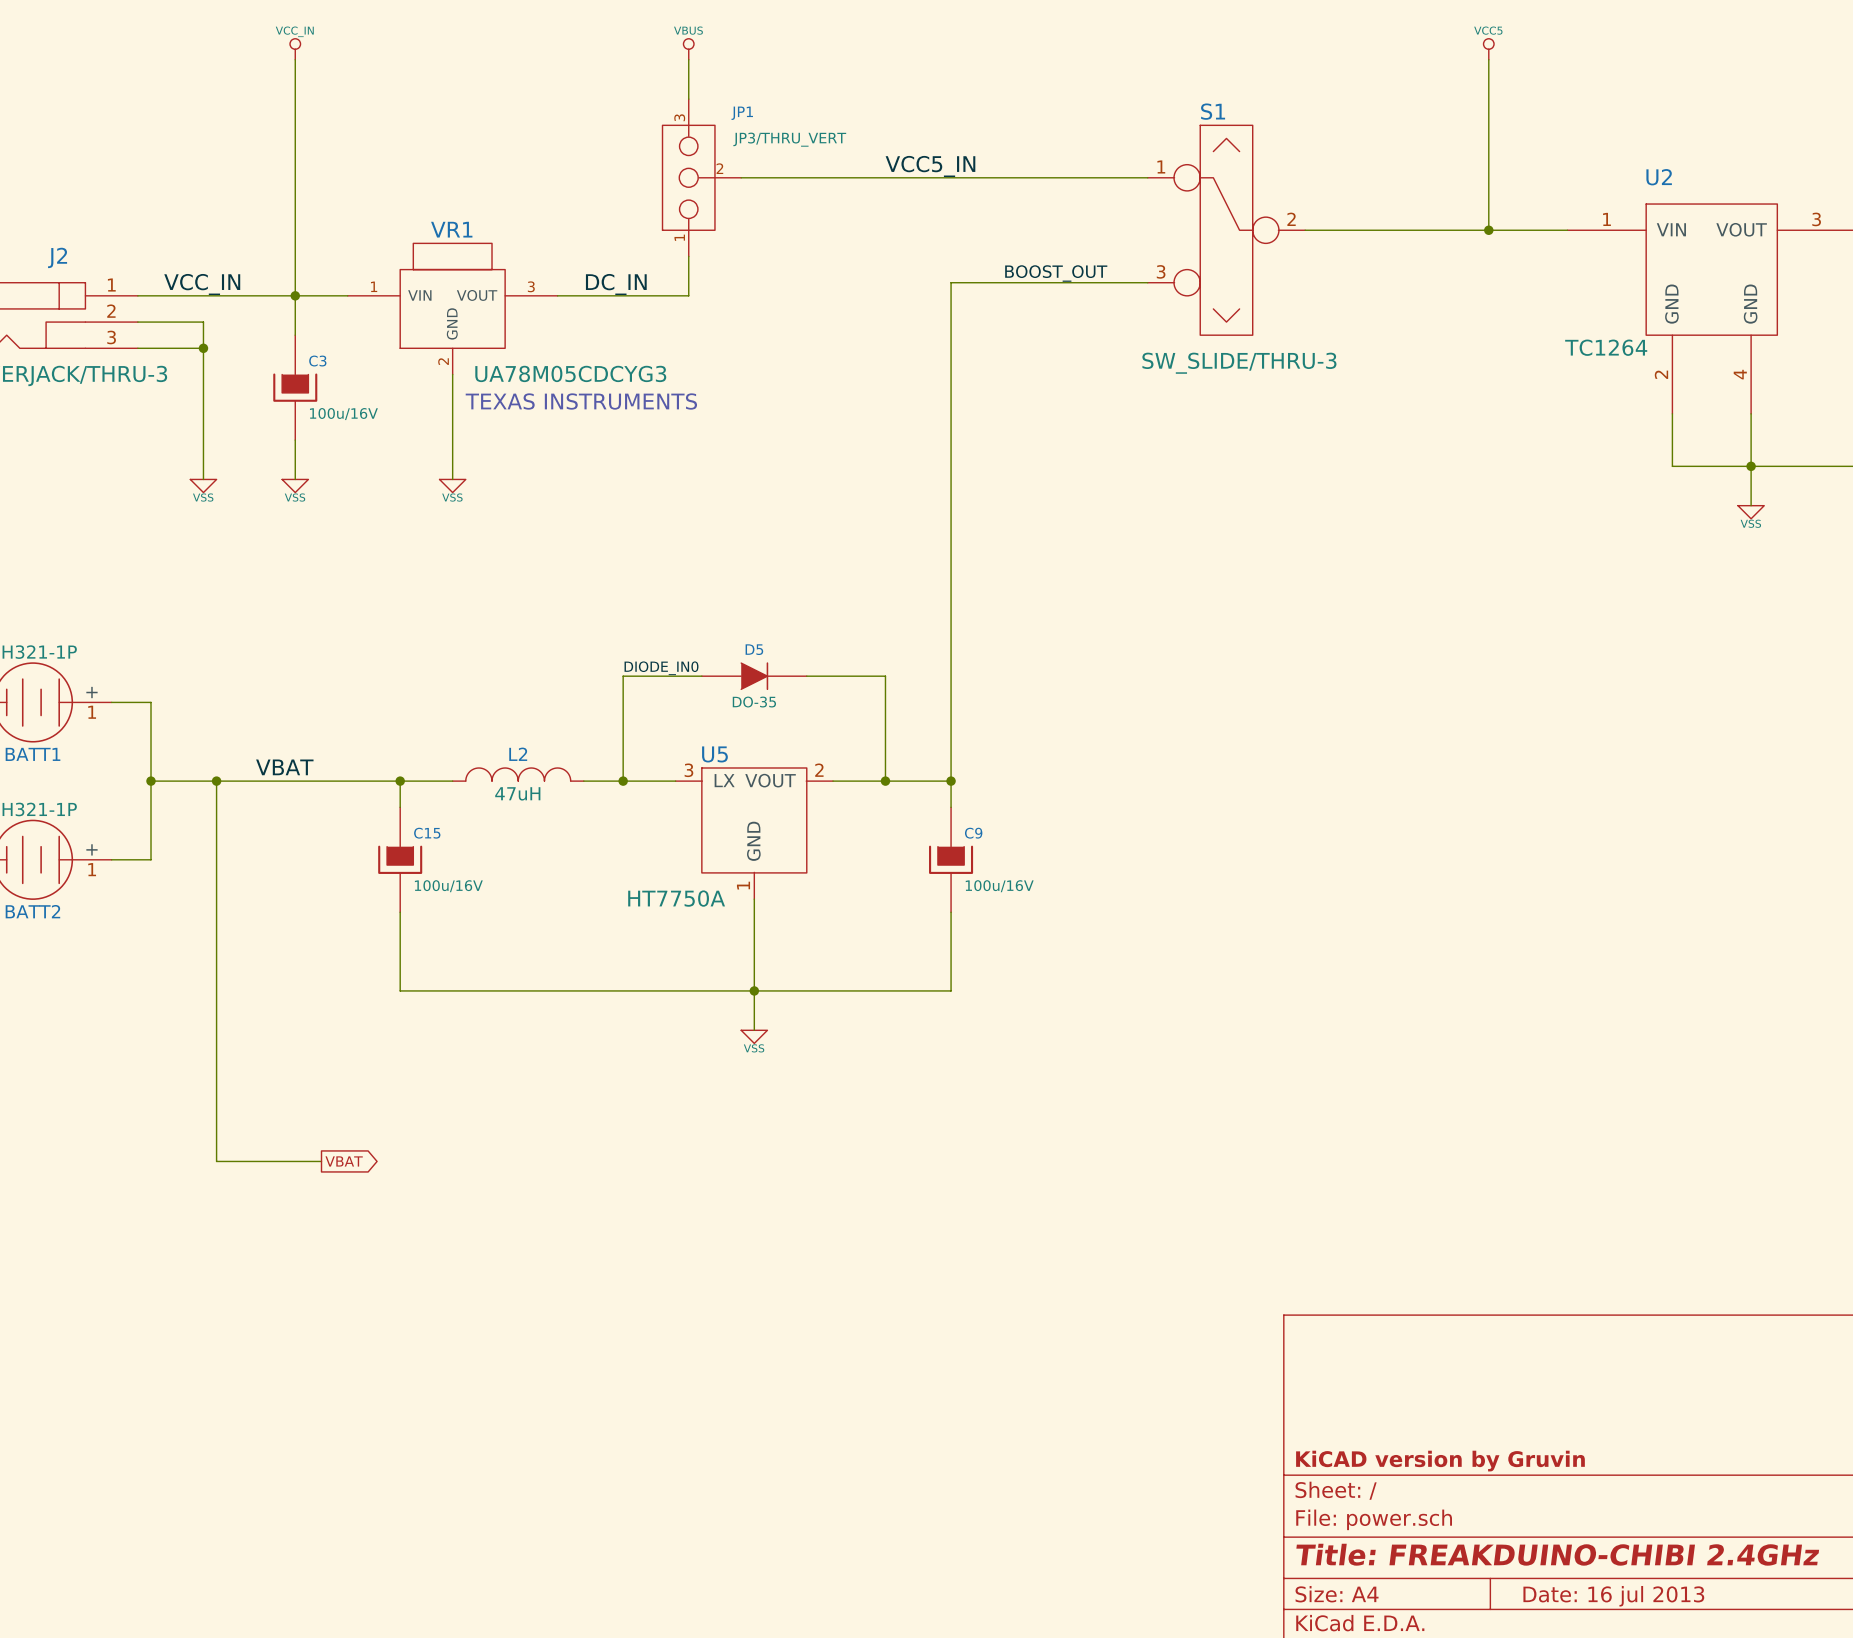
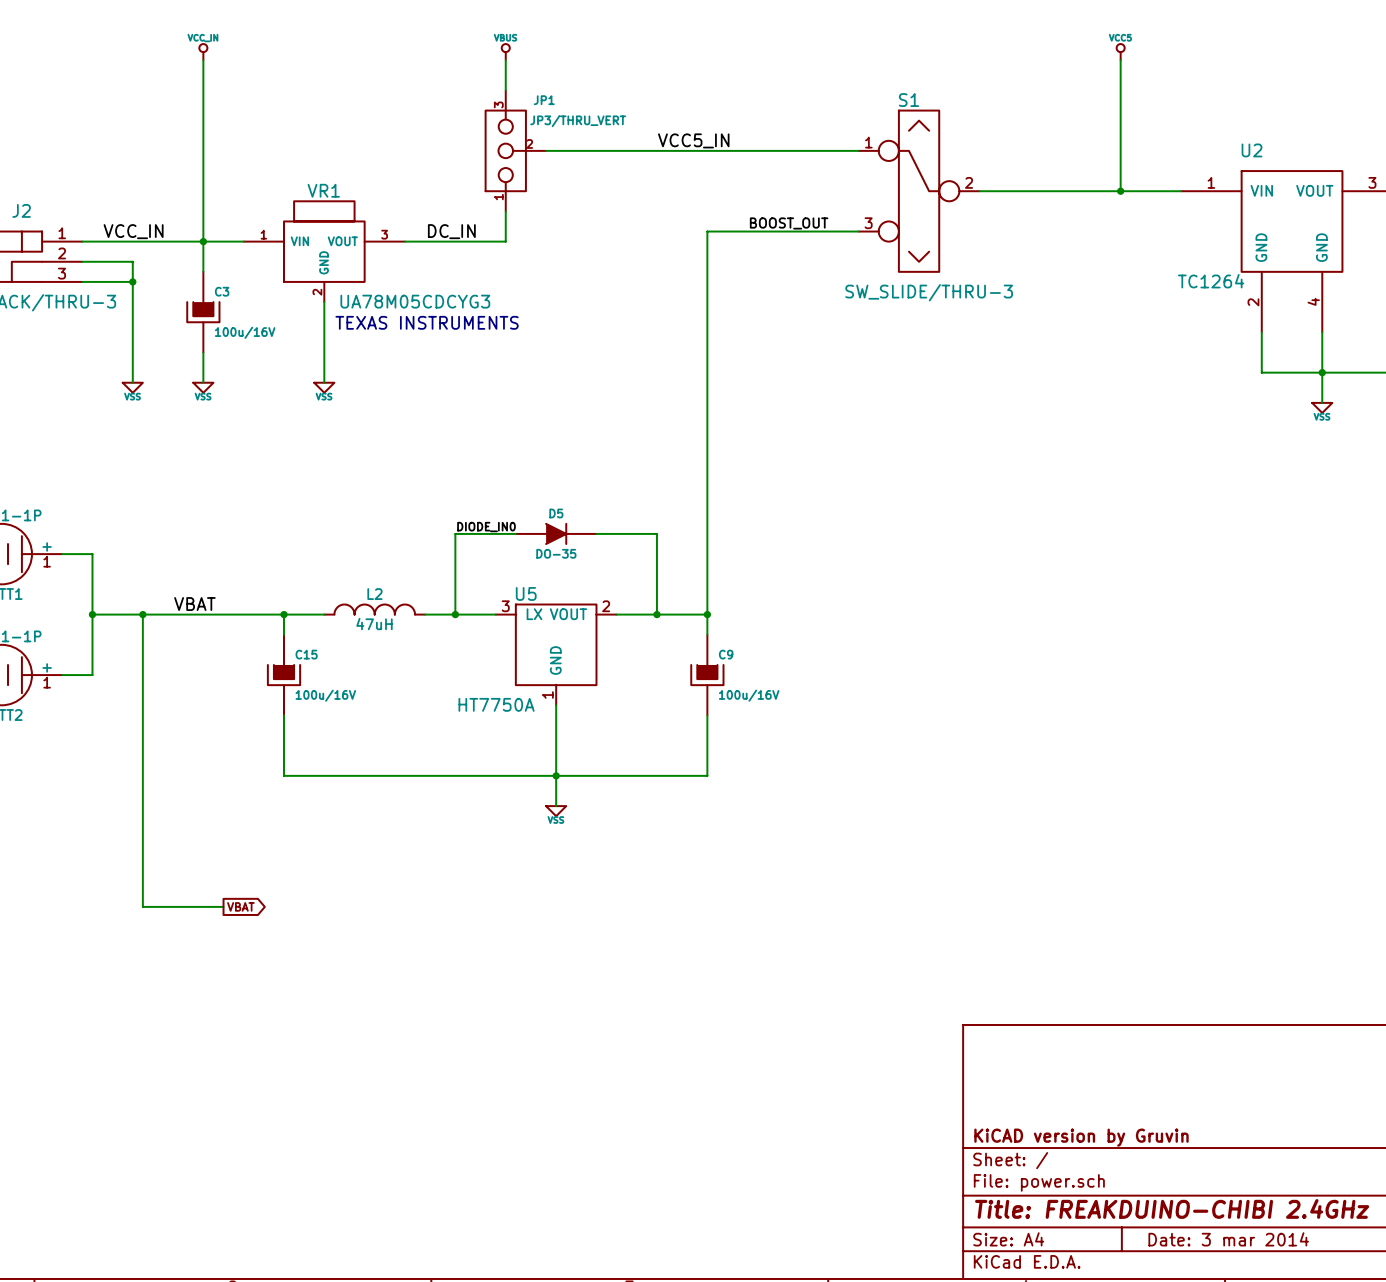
title block: Date: 16 jul 2013 (1613, 1596) -> Date: 3 mar 2014 (1228, 1239)

